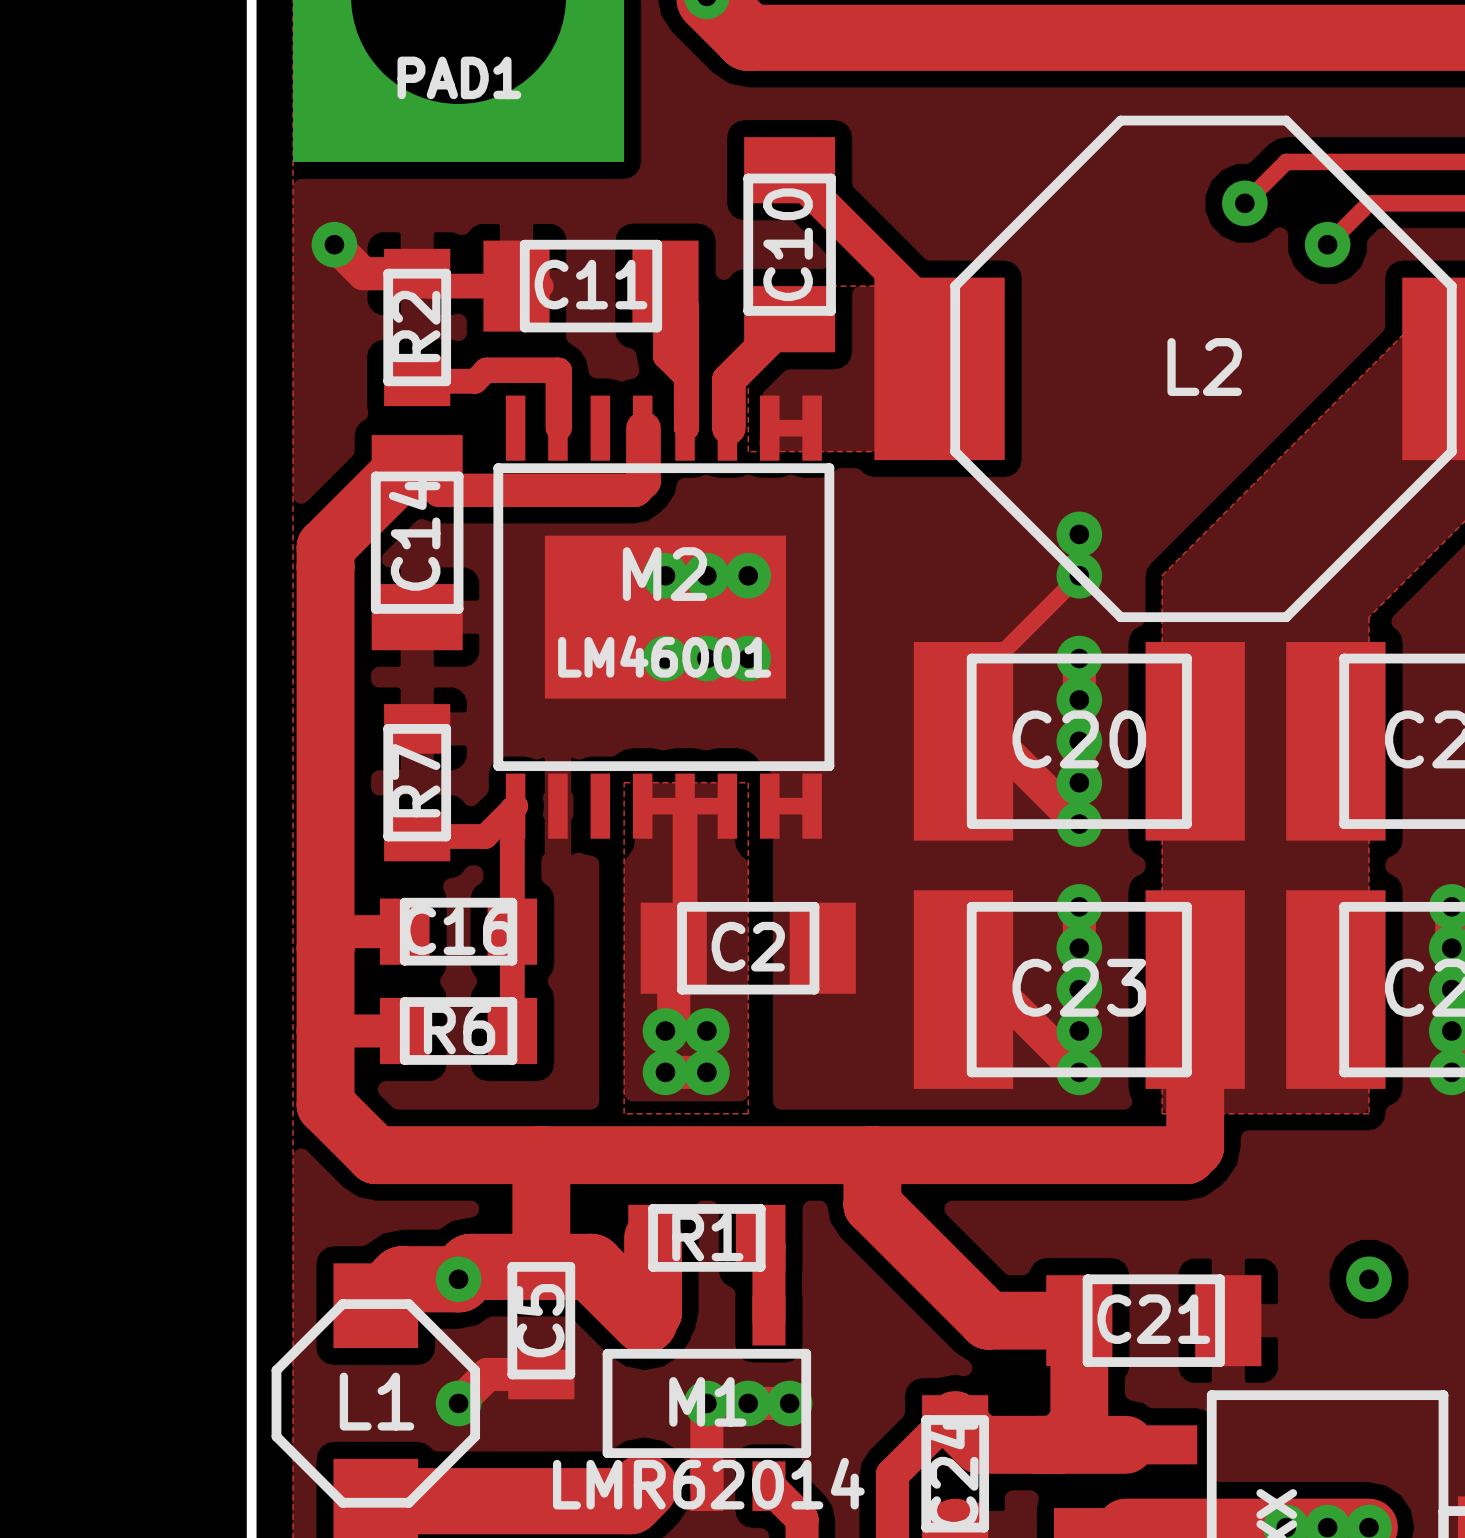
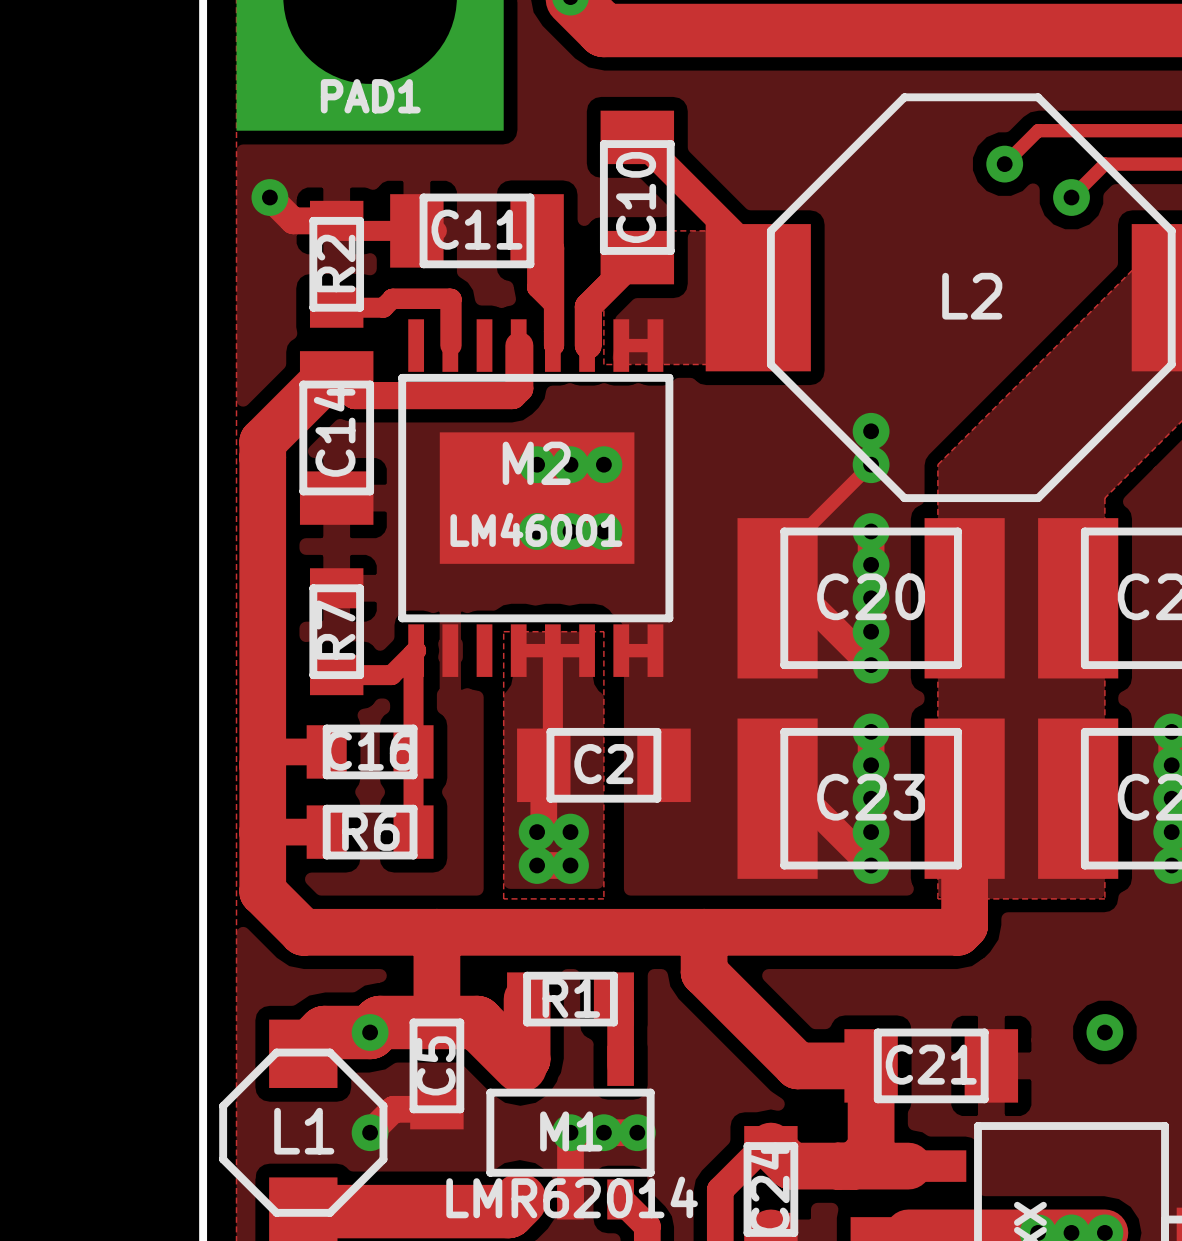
PAD1 name position: PAD1 (459, 77) -> PAD1 (370, 96)

